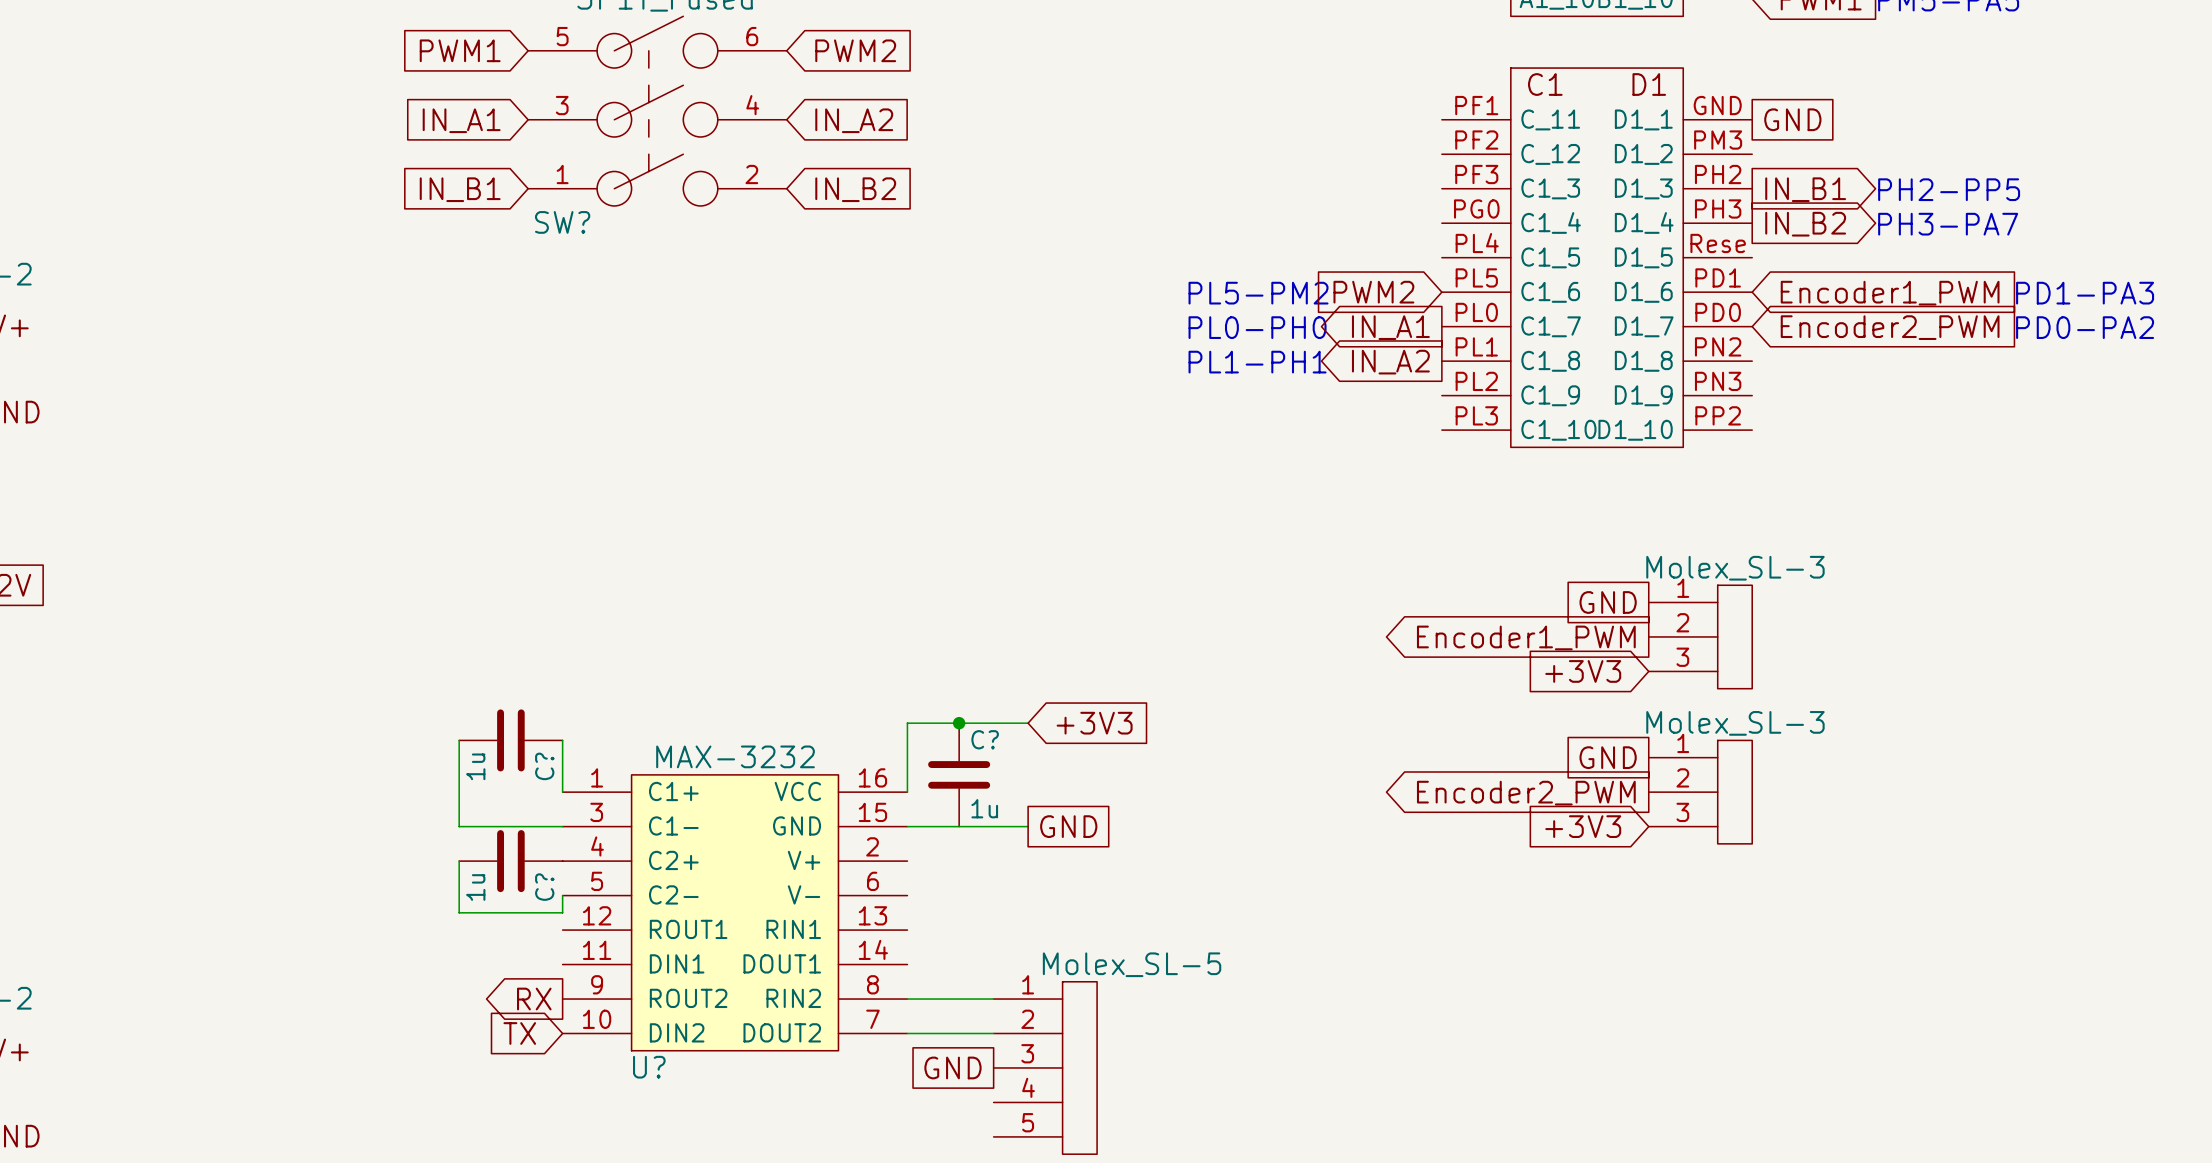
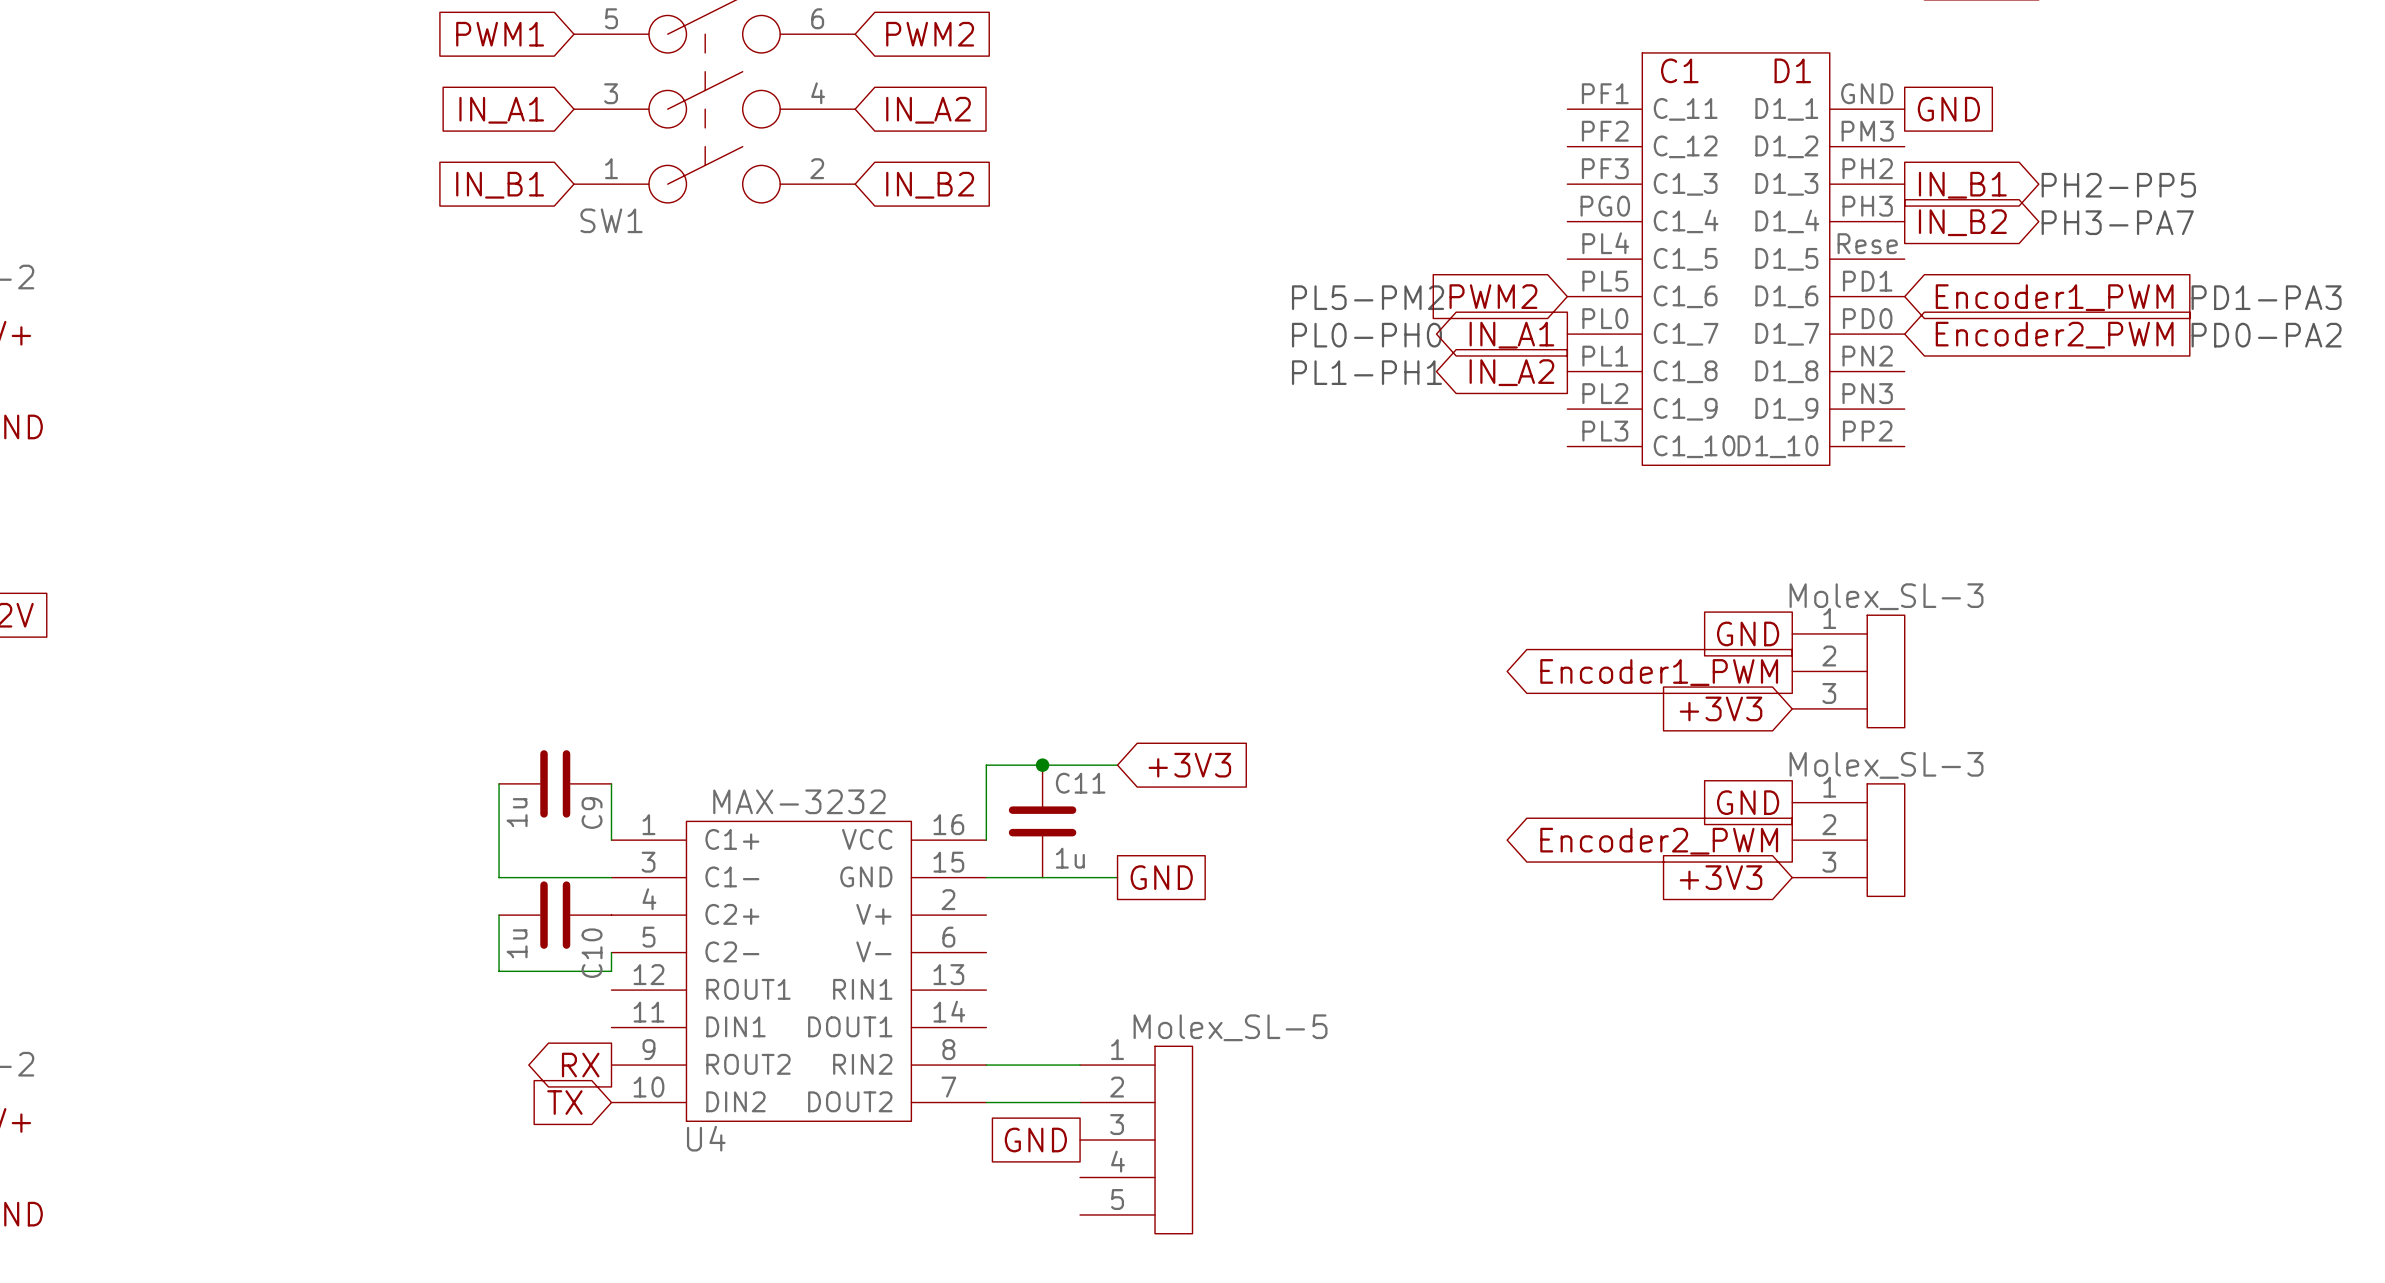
SW? name: SW? (562, 222) -> SW1 (611, 220)
C? name: C? (985, 739) -> C11 (1080, 783)
C? name: C? (544, 766) -> C9 (592, 813)
C? name: C? (544, 887) -> C10 (592, 953)
U? name: U? (649, 1067) -> U4 (706, 1138)

